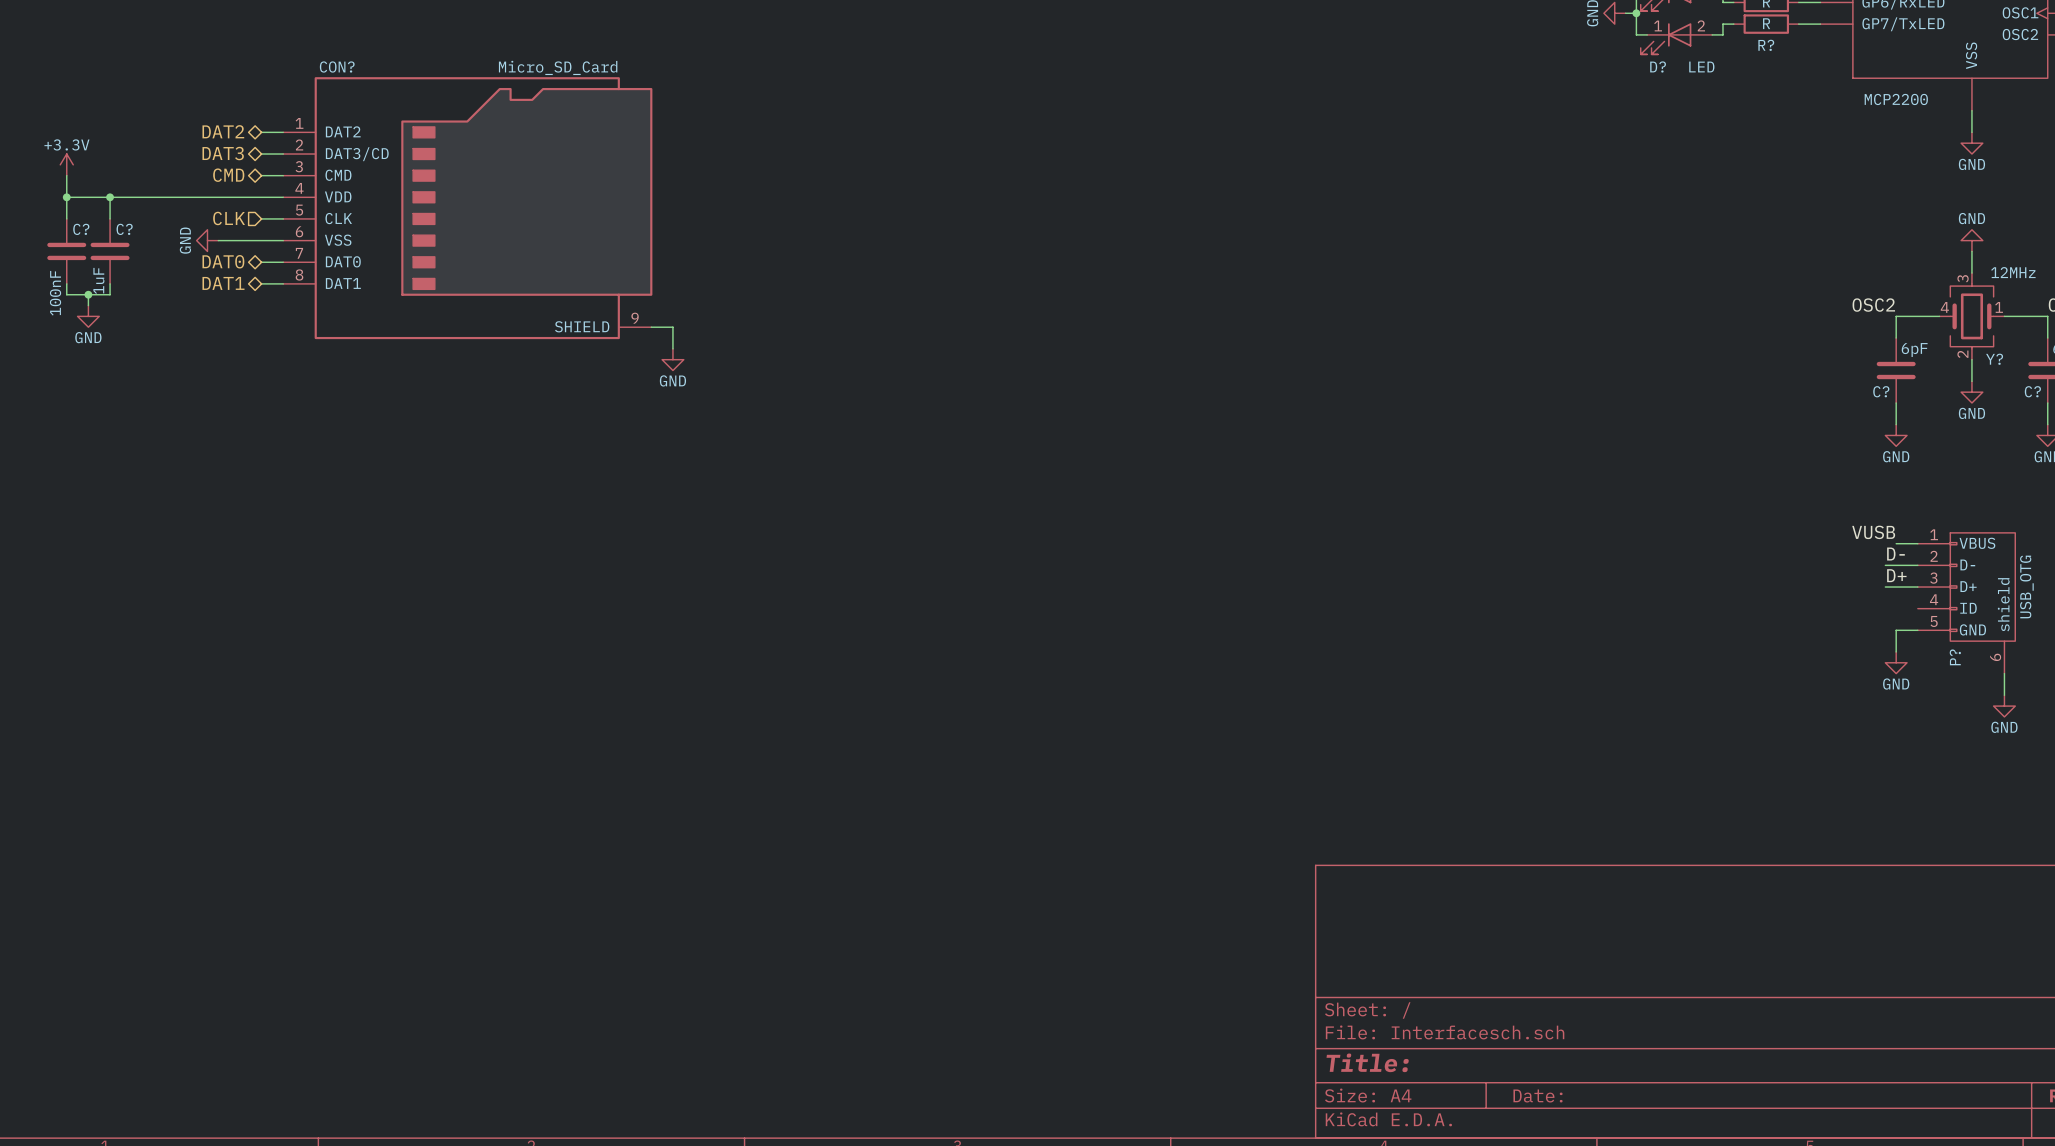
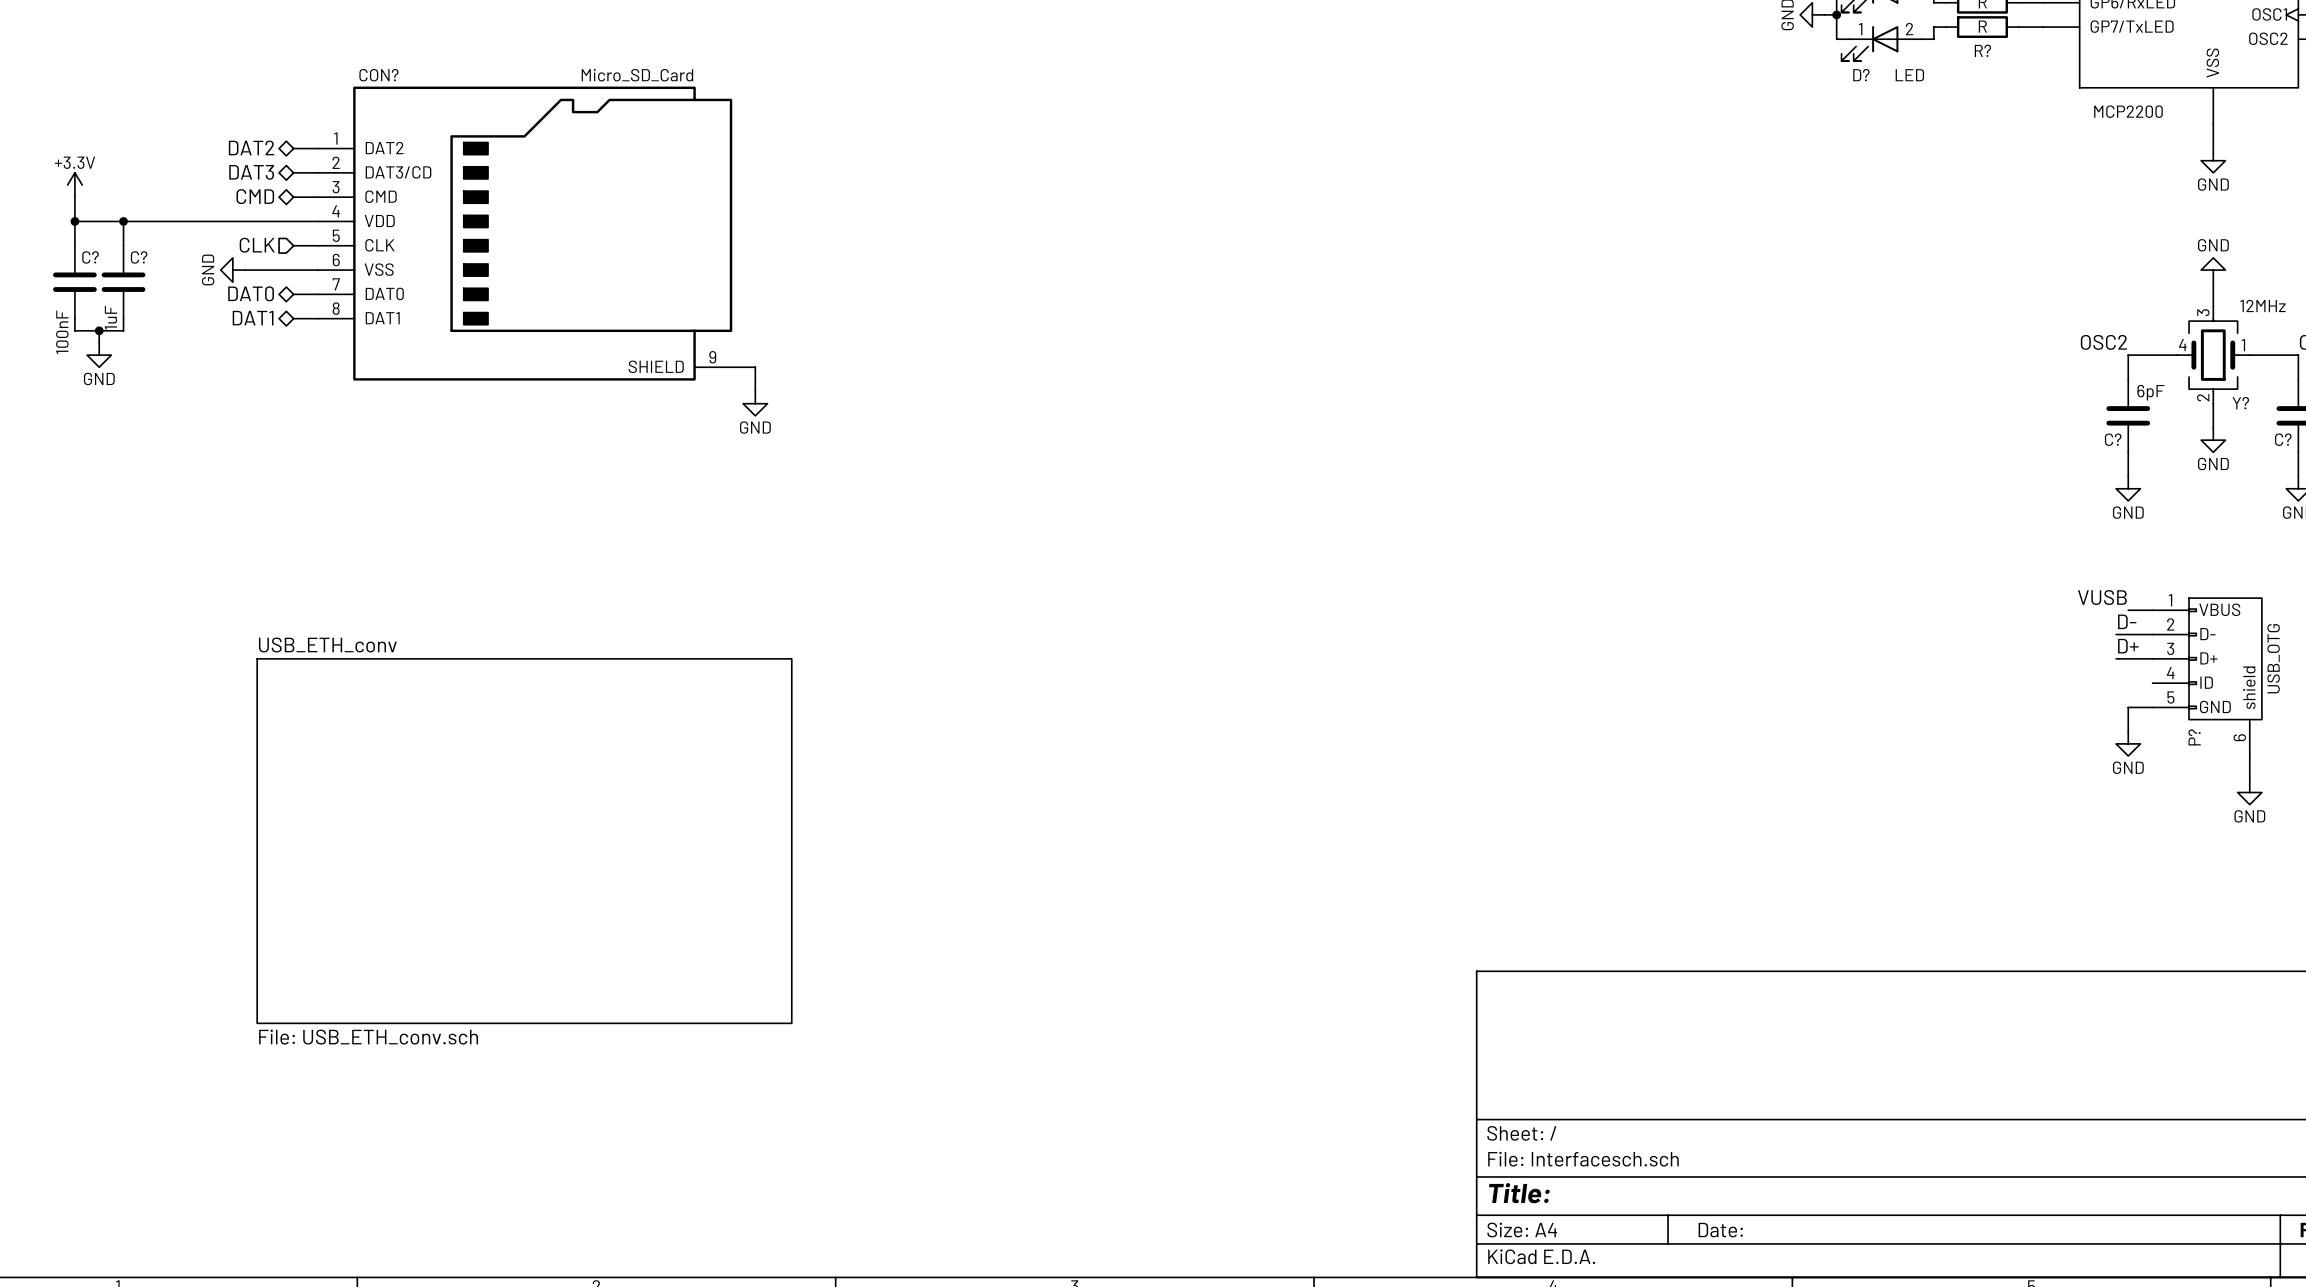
sheet USB_ETH_conv: none -> File: USB_ETH_conv.sch (524, 841)

